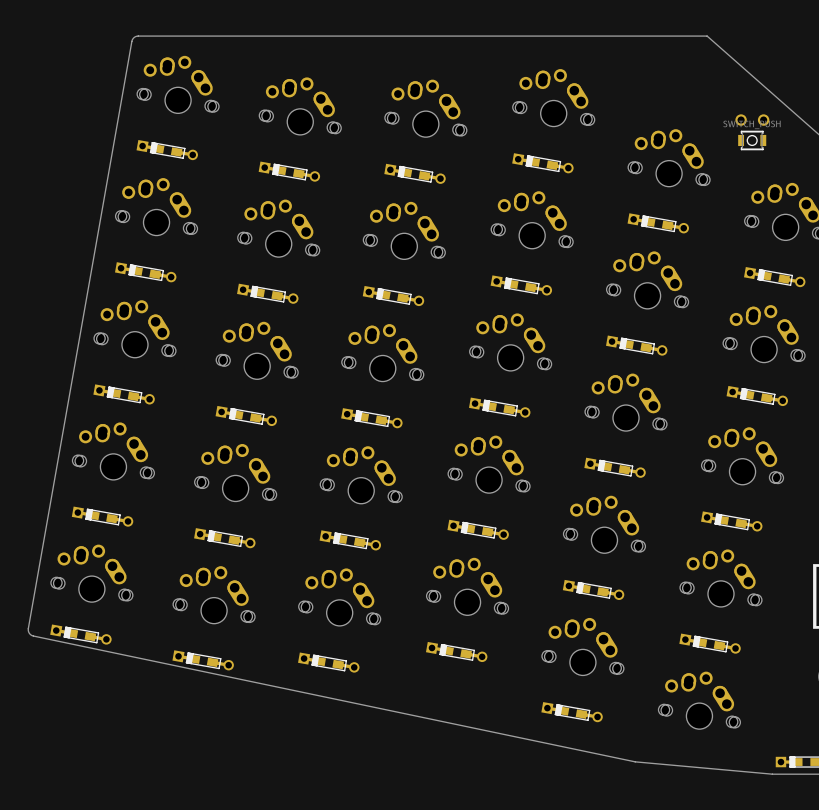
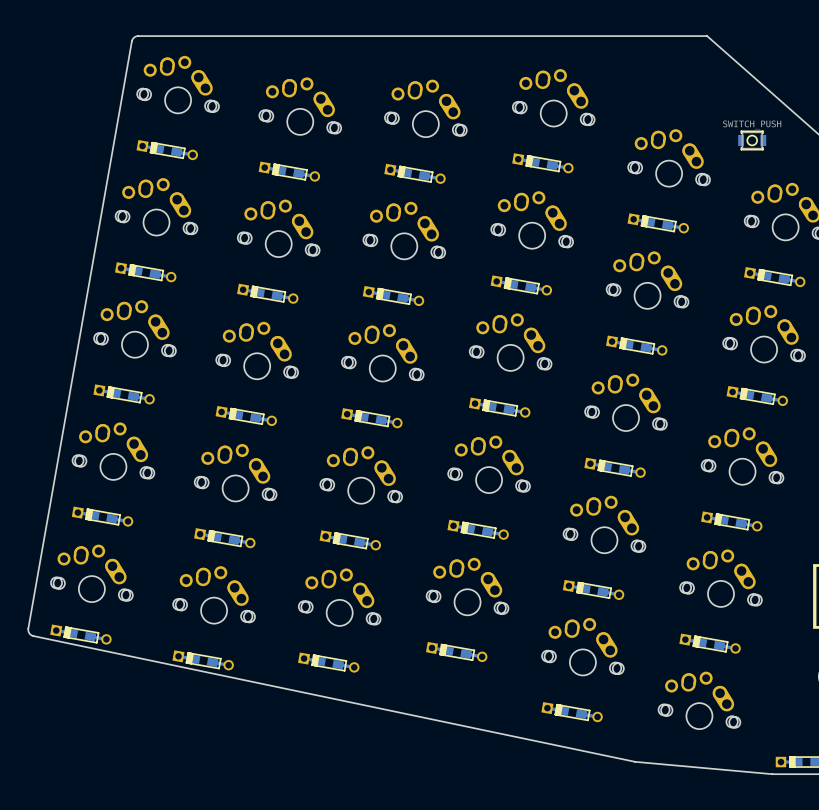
part: (741, 120) -> none
part: (763, 120) -> none

